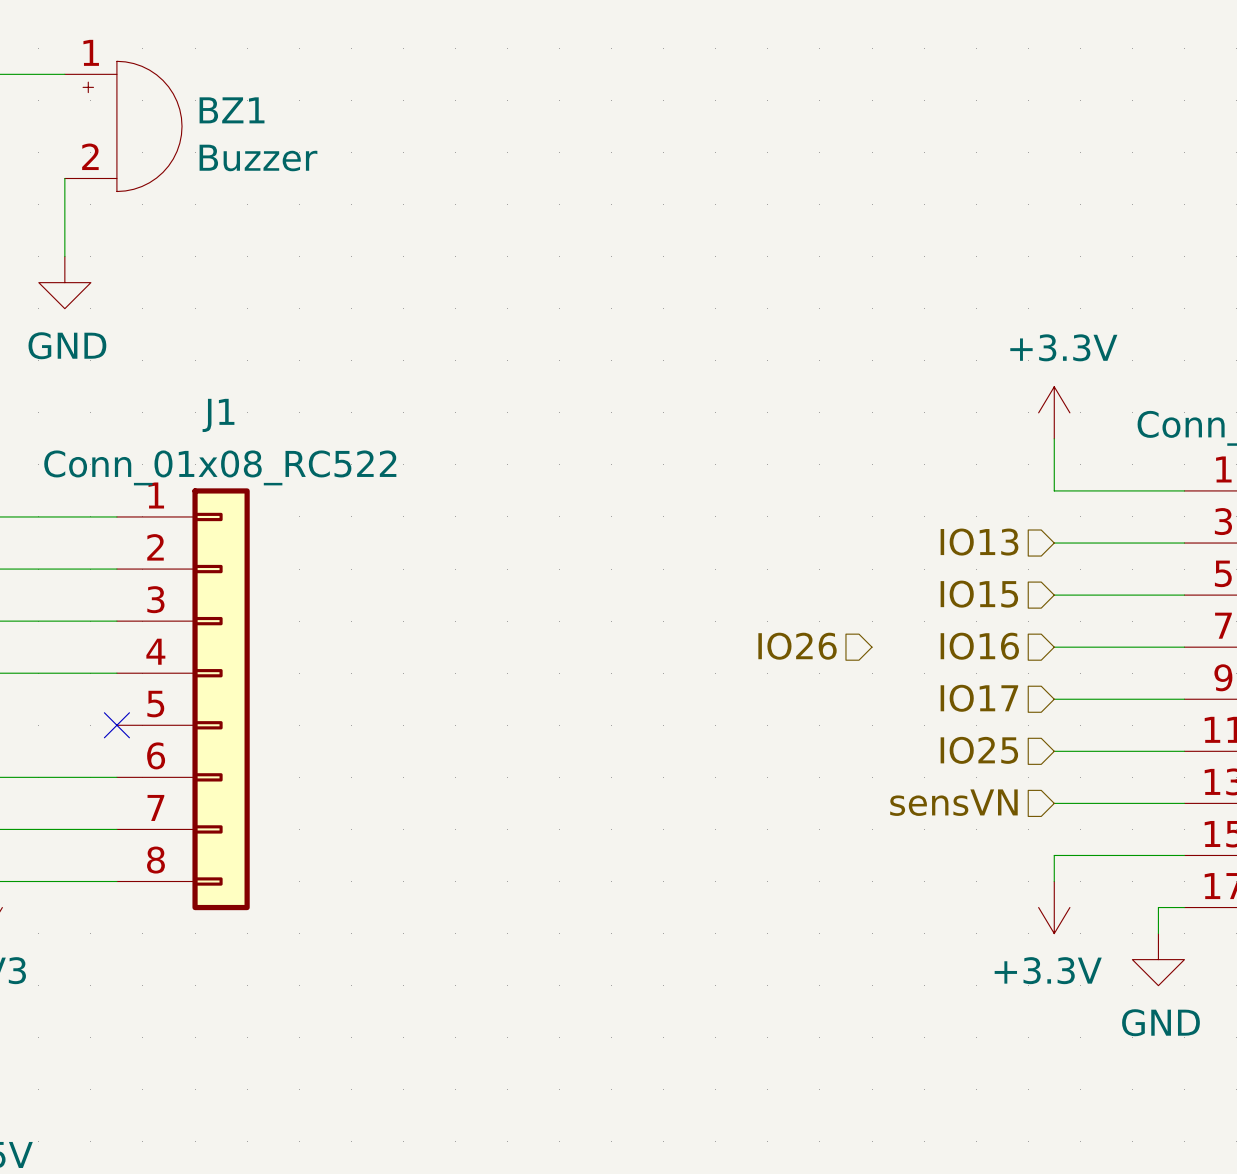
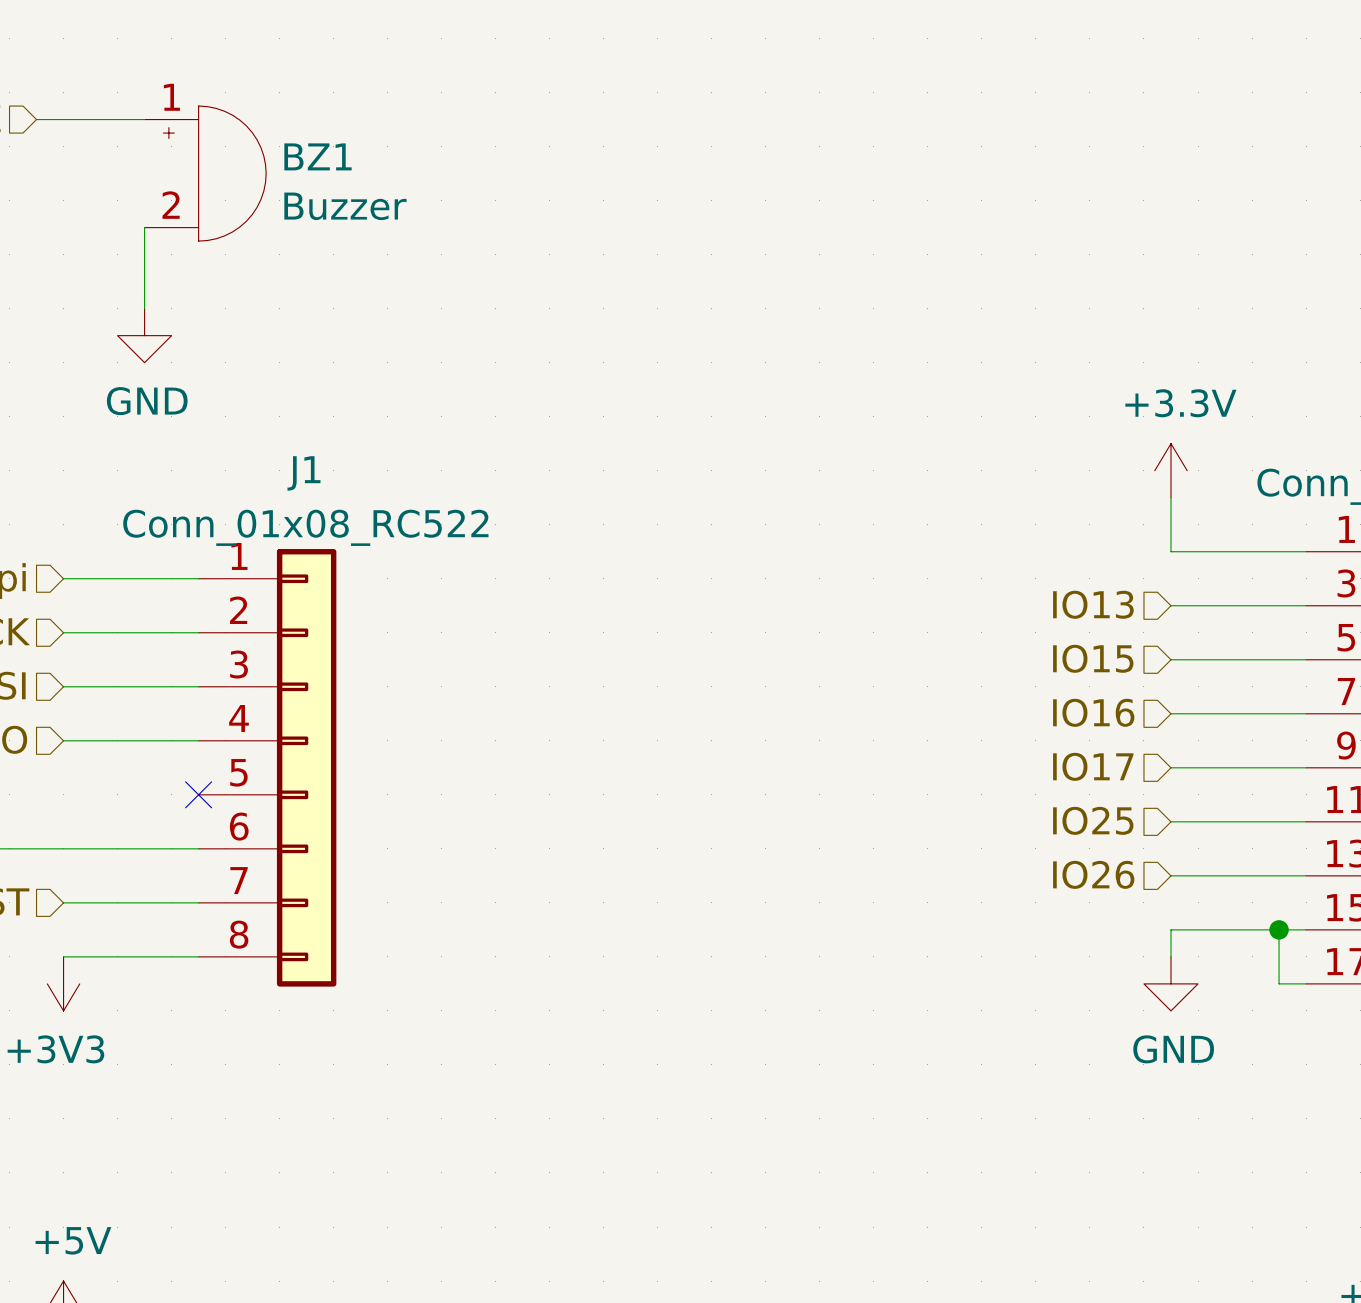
hierarchical label: IO26 (797, 646) -> none
hierarchical label: sensVN (953, 802) -> IO26 (1093, 874)
junction: none -> (1279, 929)
power symbol: +3.3V (1054, 907) -> GND (1170, 983)
wire: (1158, 907) (1158, 933) -> (1279, 983) (1279, 929)
power symbol: GND (1158, 959) -> none

